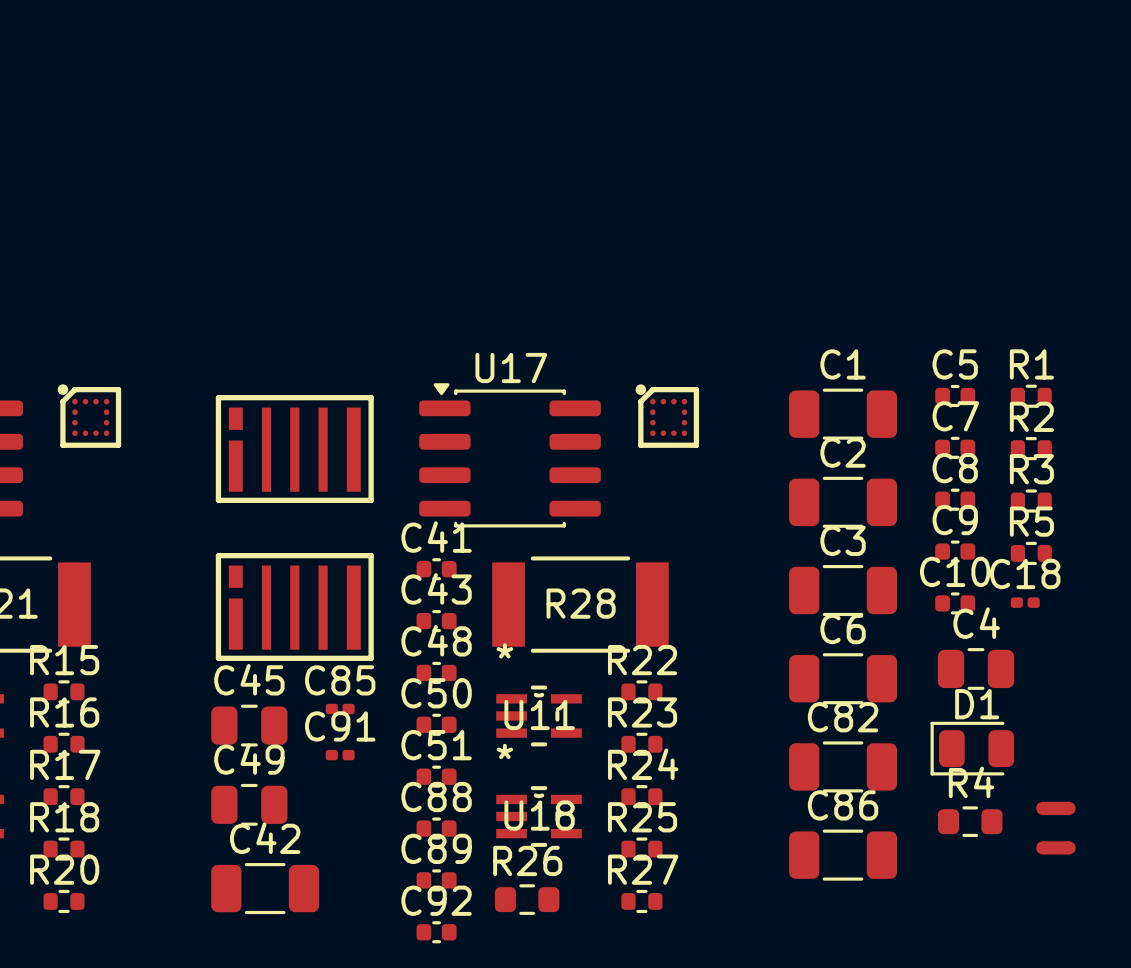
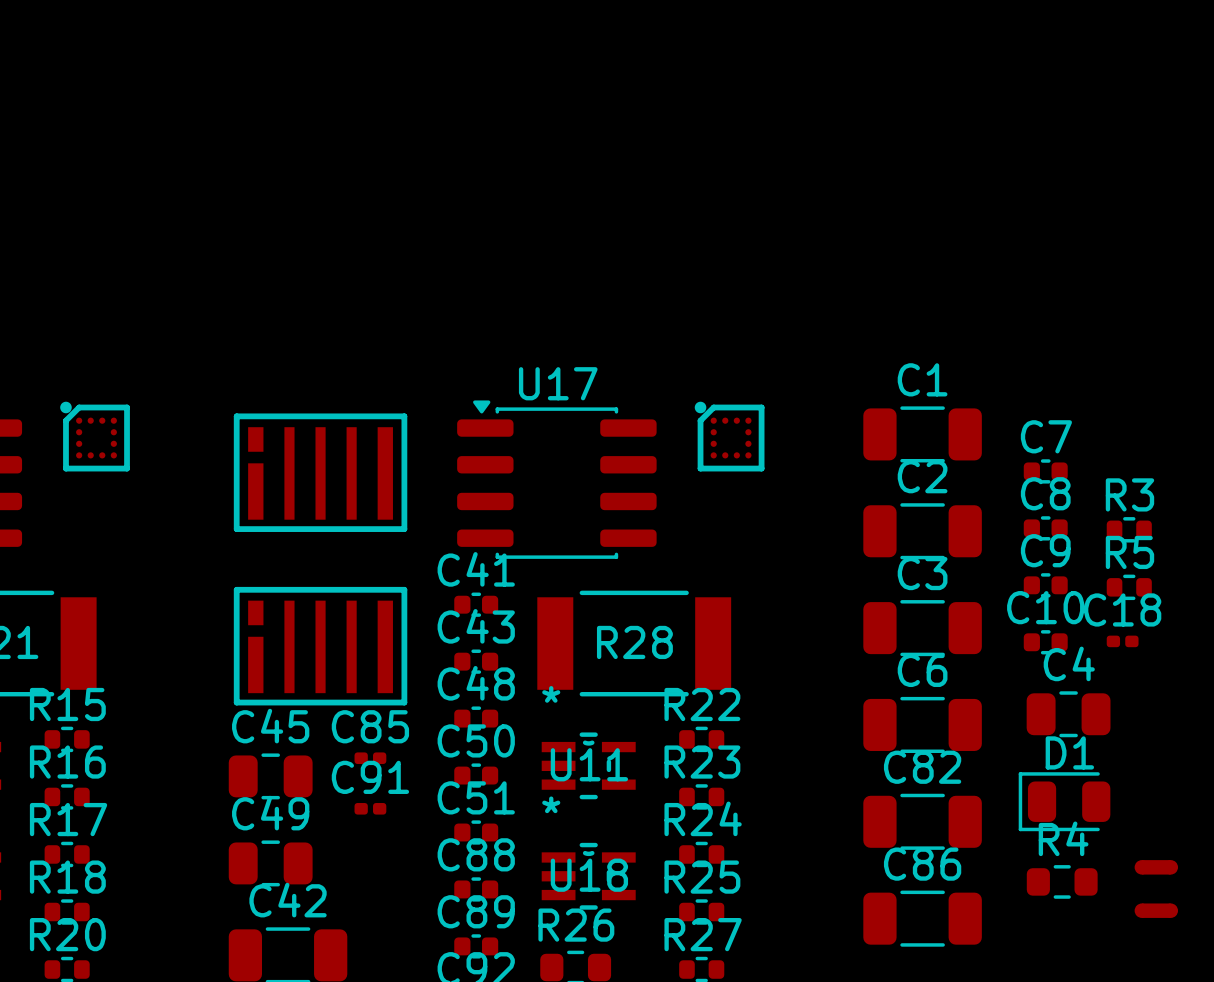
C5: (955, 395) -> none
R1: (1031, 396) -> none
R2: (1031, 448) -> none

